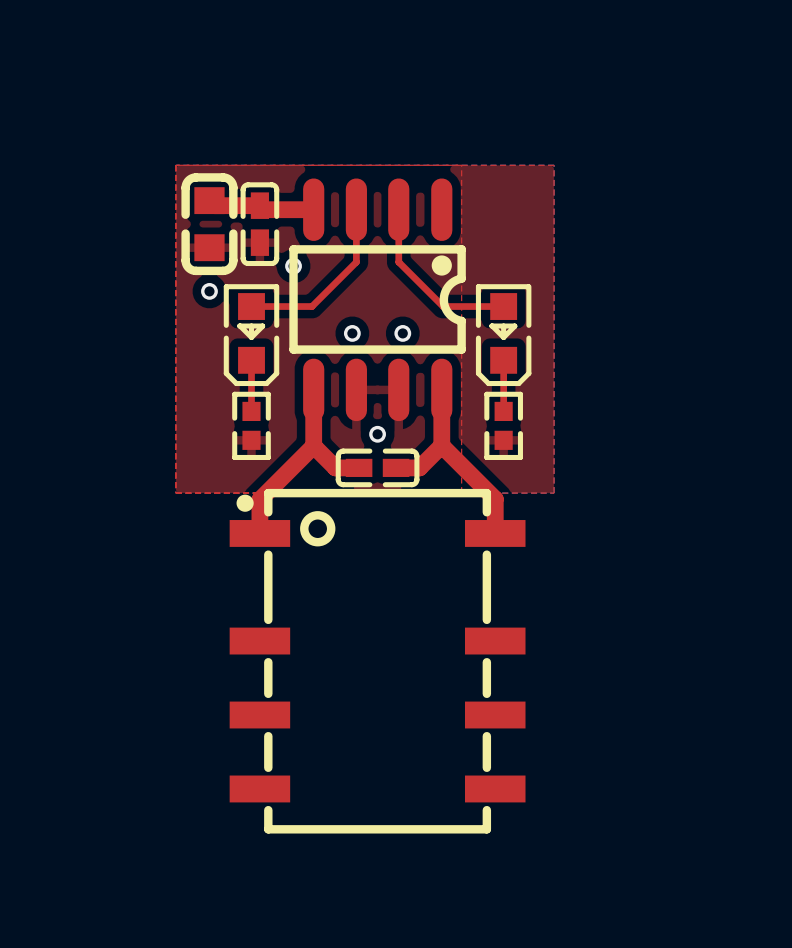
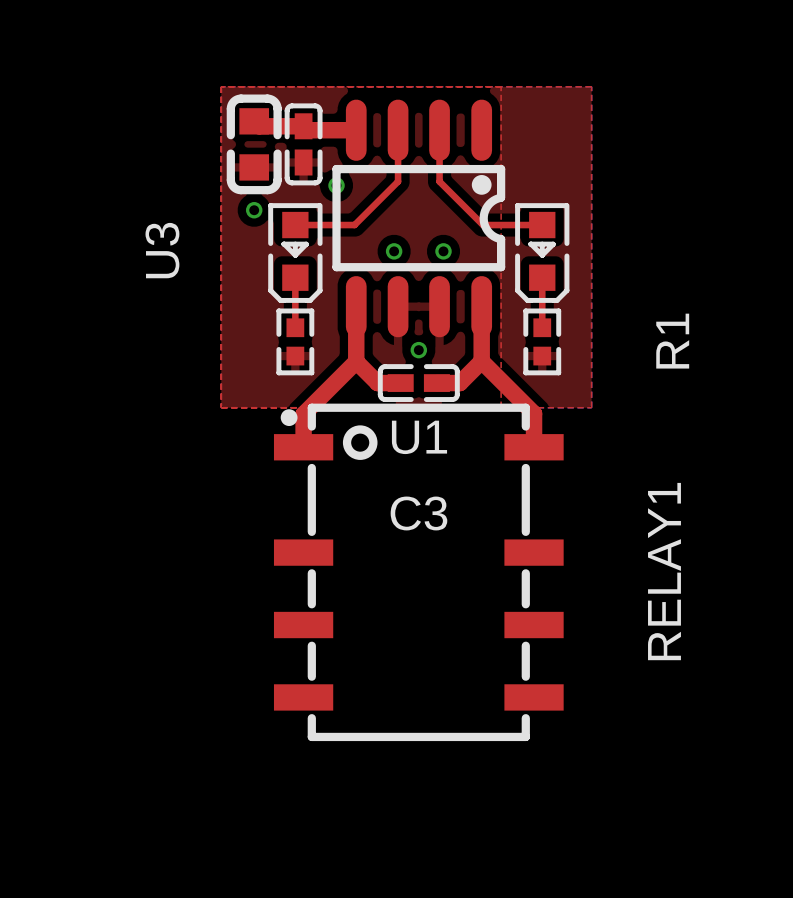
U3 name: none -> U3 (162, 250)
R1 name: none -> R1 (672, 341)
U1 name: none -> U1 (419, 437)
C3 name: none -> C3 (418, 513)
RELAY1 name: none -> RELAY1 (664, 571)

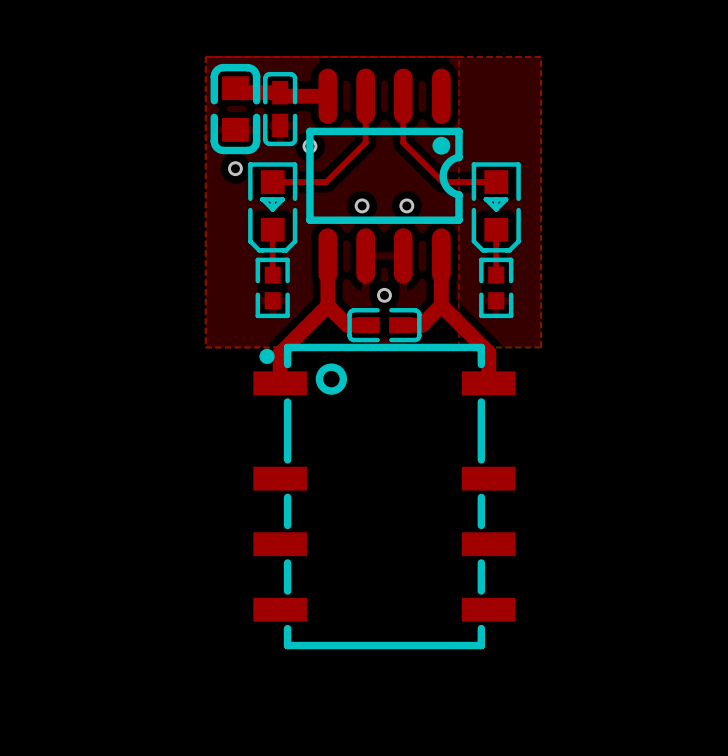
U3 name: U3 (162, 250) -> none
R1 name: R1 (672, 341) -> none
U1 name: U1 (419, 437) -> none
C3 name: C3 (418, 513) -> none
RELAY1 name: RELAY1 (664, 571) -> none

